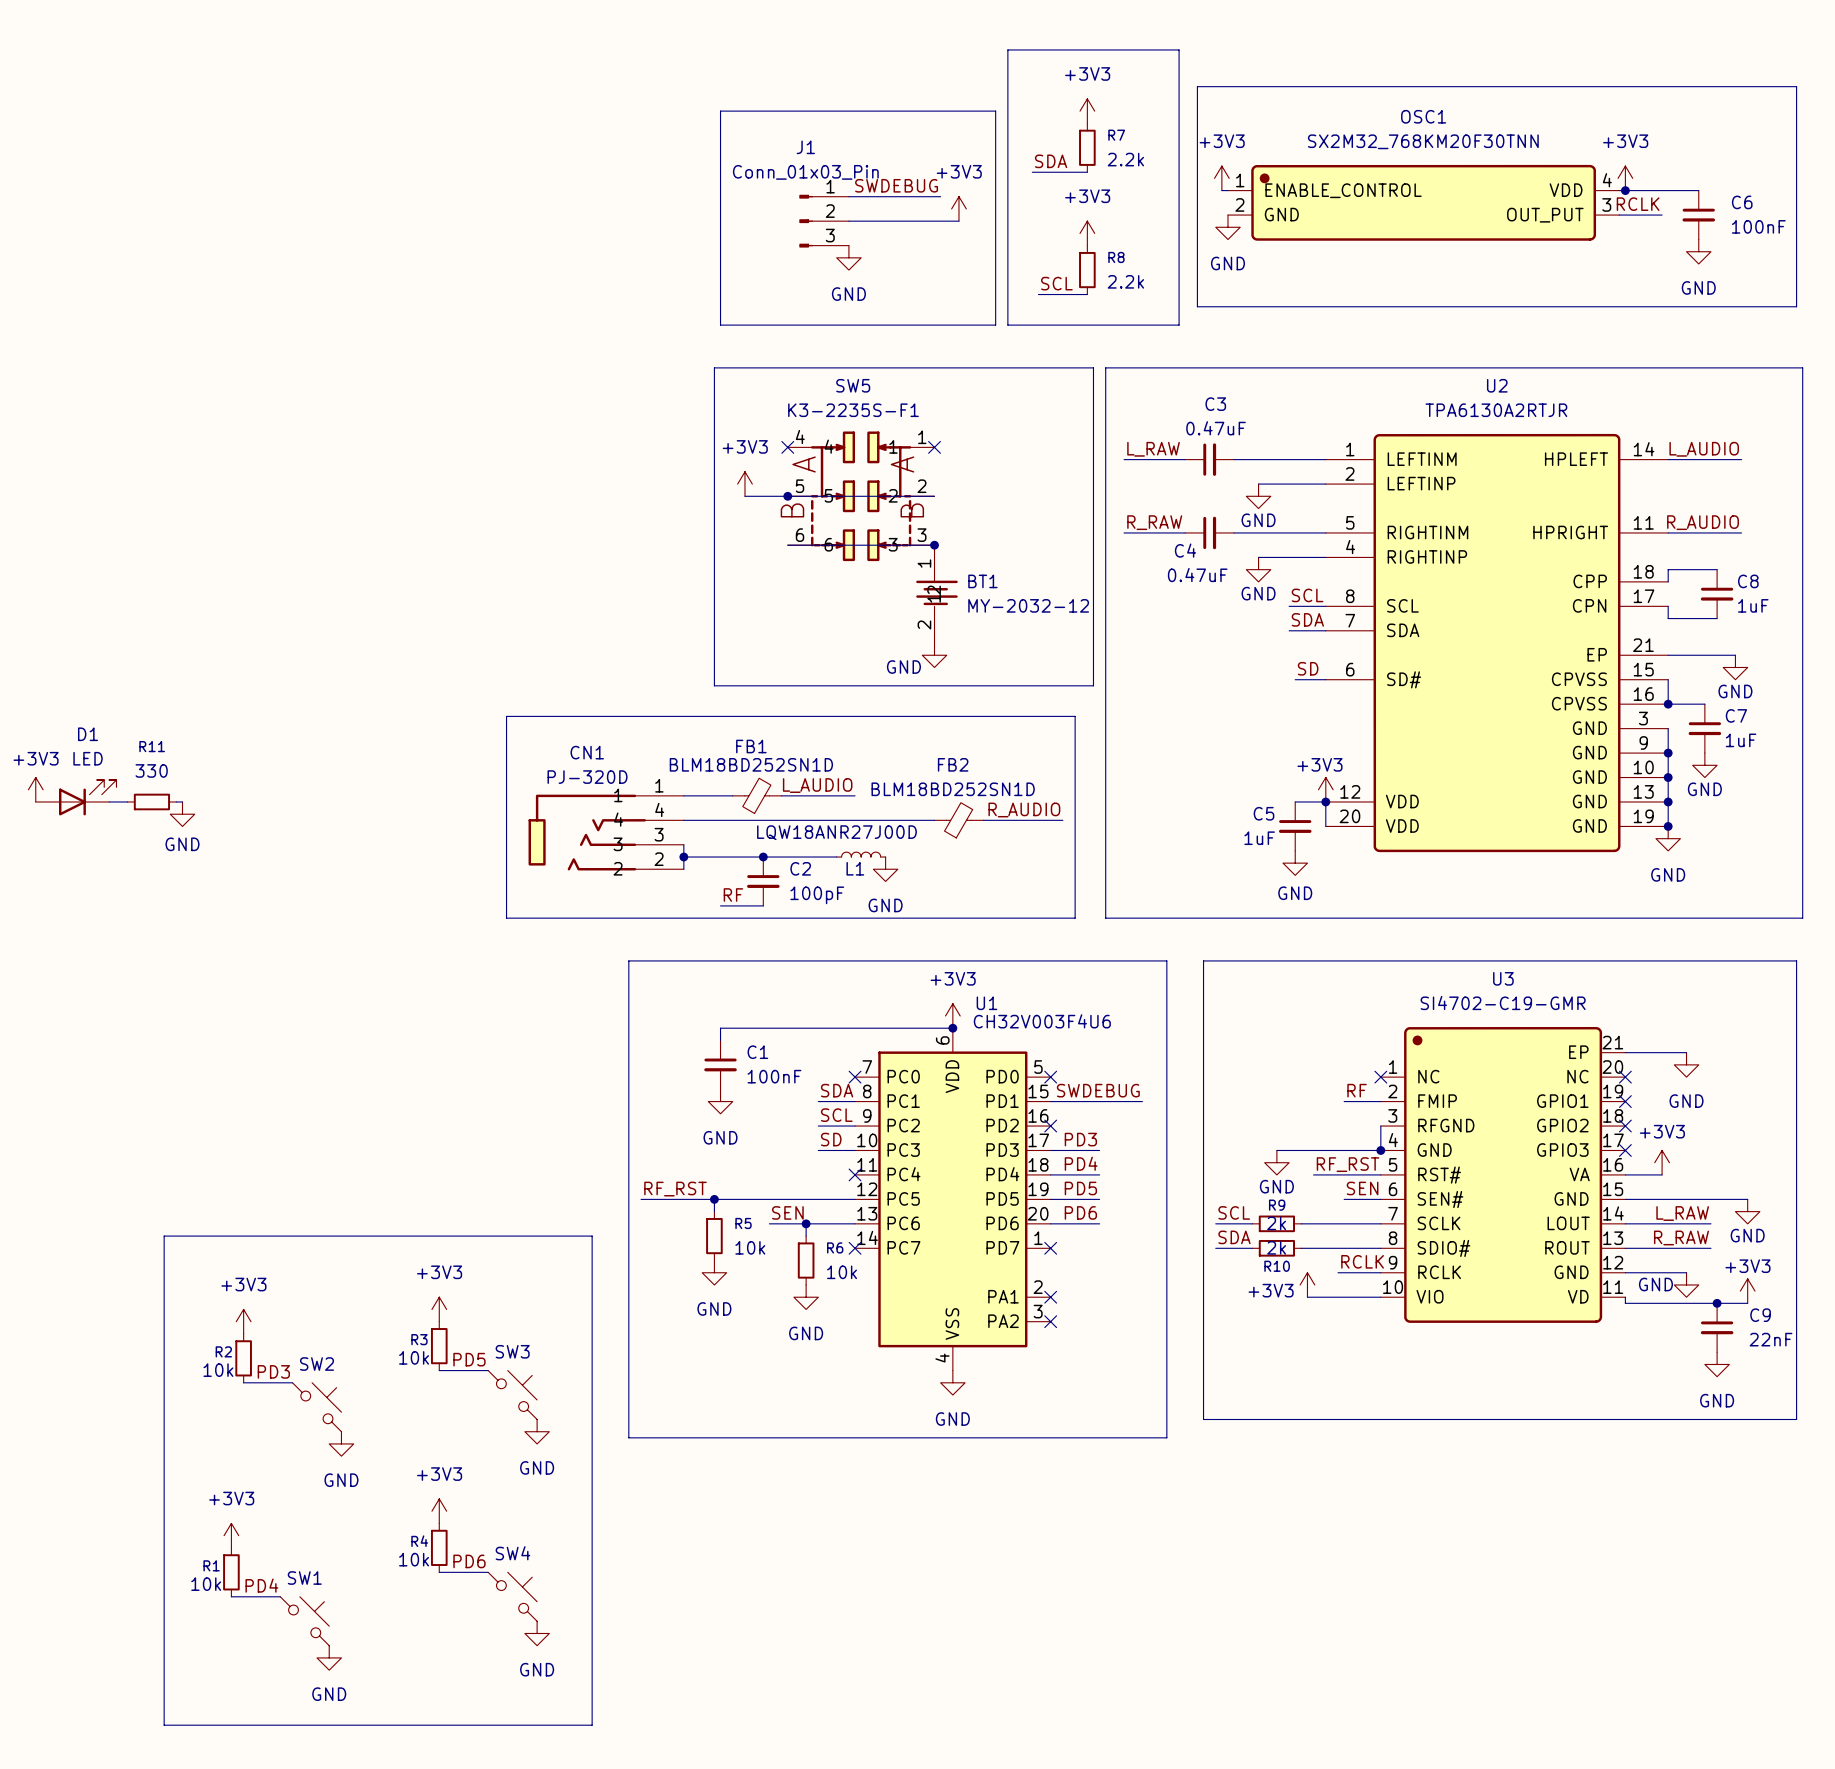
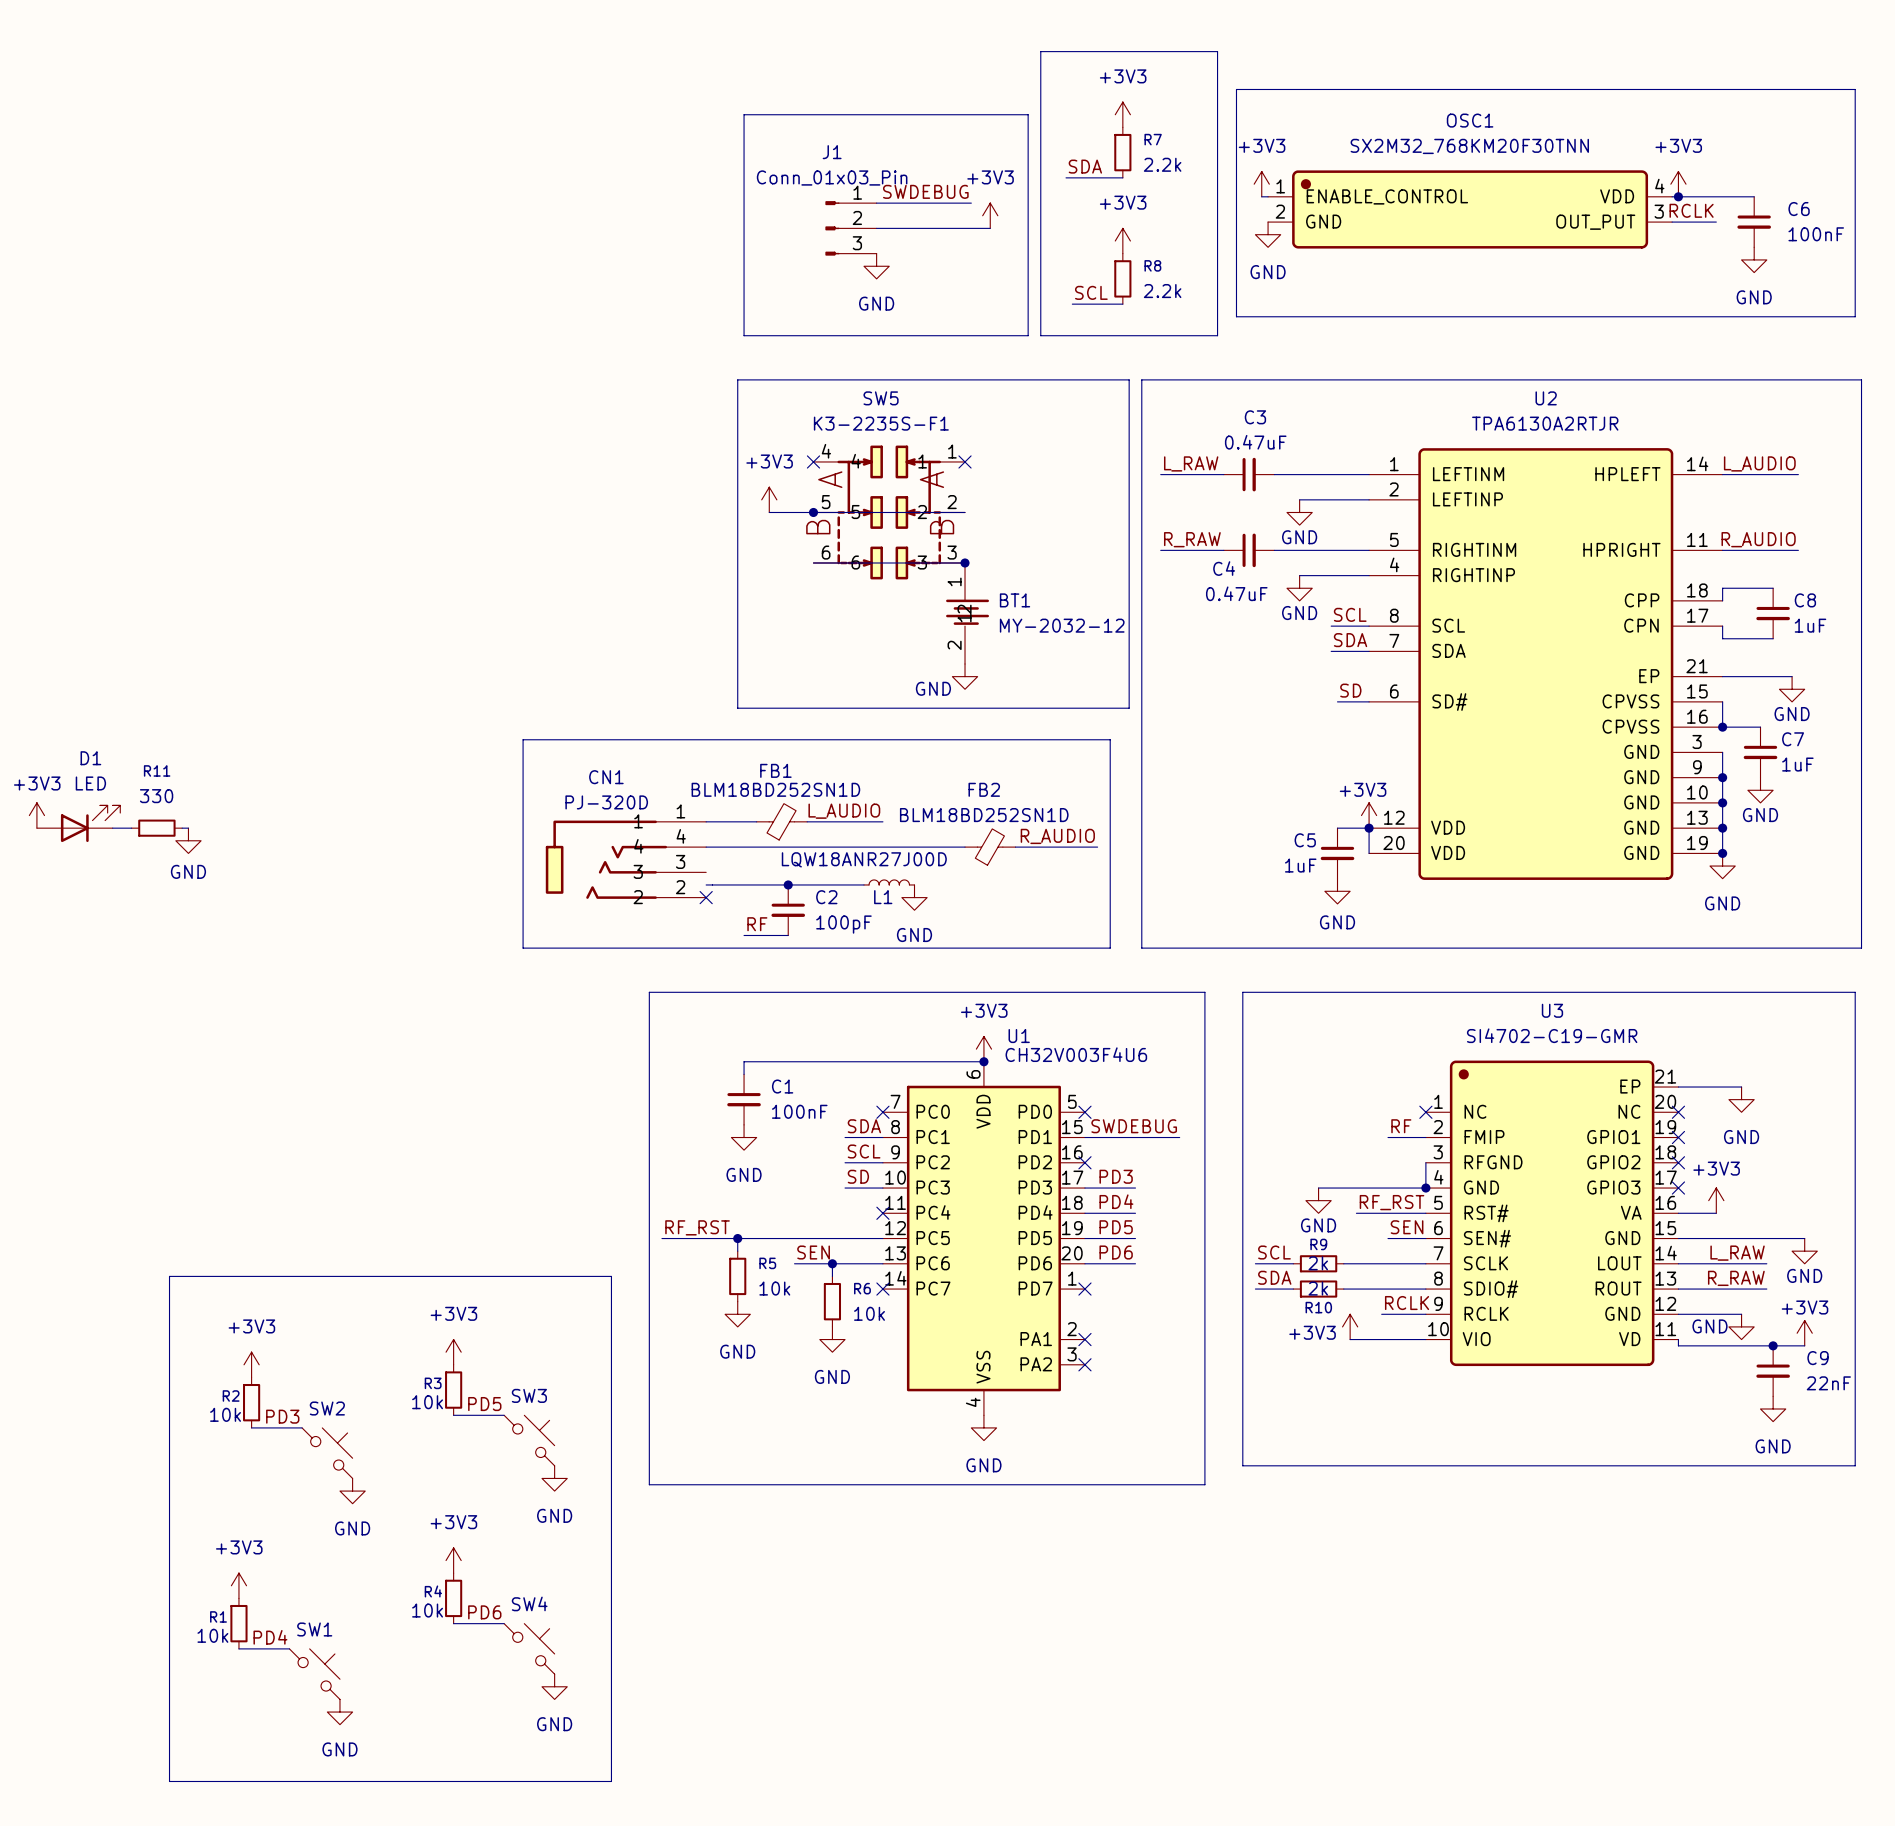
wire: (683, 844) (683, 869) -> none
junction: (683, 857) -> none
no-connect mark: none -> (706, 897)

